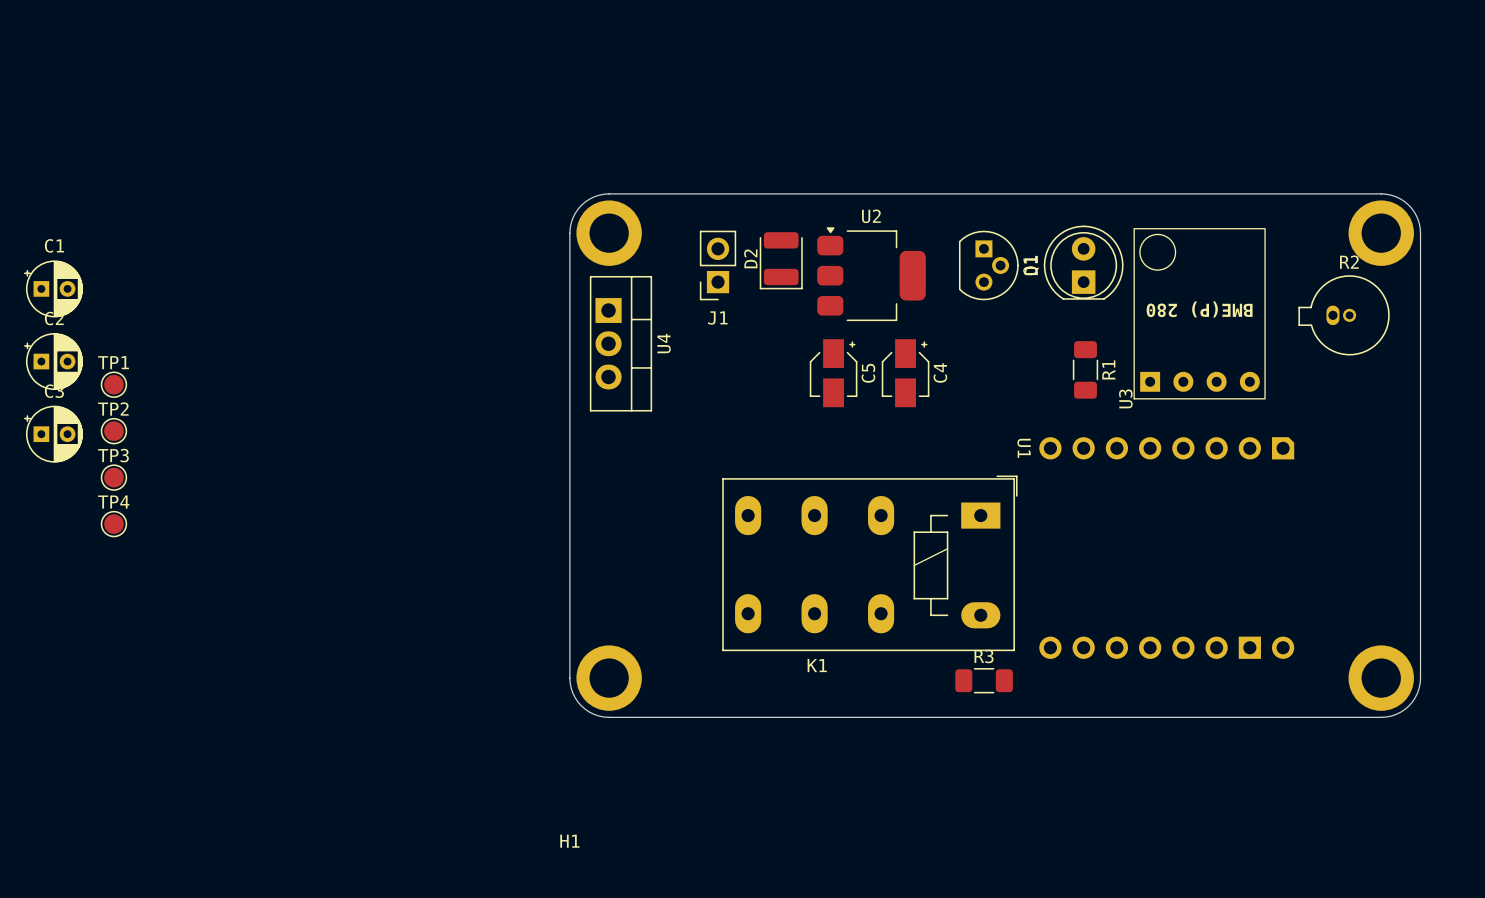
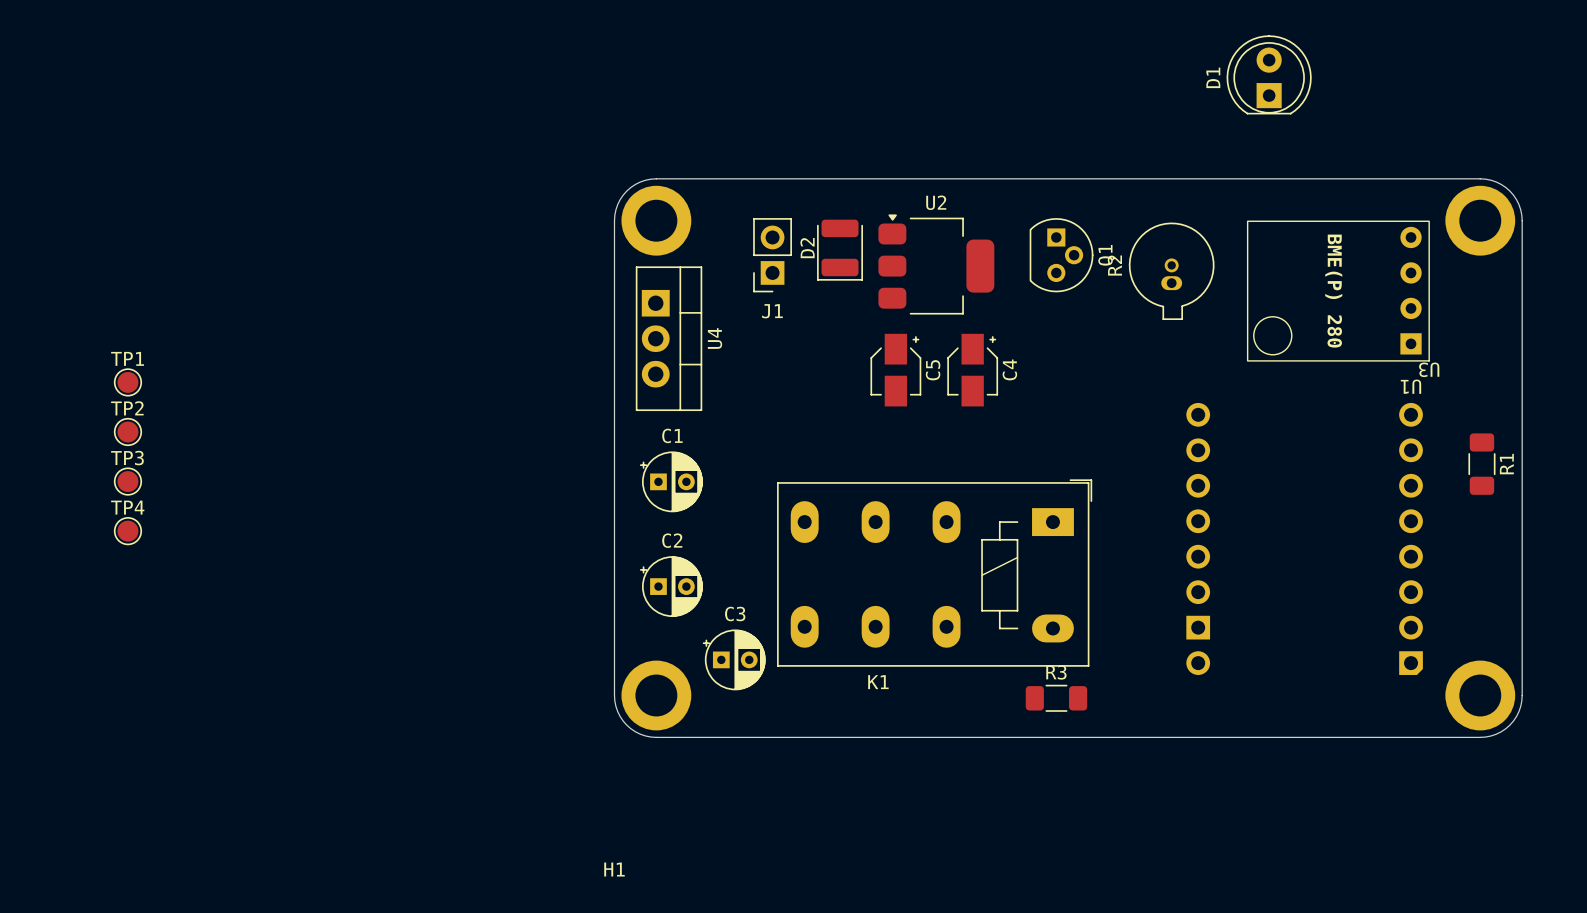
D1 position: (1083, 262) -> (1269, 74)
C1 position: (53, 288) -> (671, 481)
U3 rotation: 0° (1199, 313) -> 90° counterclockwise (1338, 291)
R2 rotation: 0° (1344, 315) -> 90° counterclockwise (1171, 271)
R2 position: (1344, 315) -> (1171, 271)
C2 position: (53, 361) -> (671, 586)
R1 position: (1085, 369) -> (1481, 464)
C3 position: (53, 434) -> (734, 659)
U1 rotation: 0° (1166, 548) -> 90° clockwise (1304, 538)

